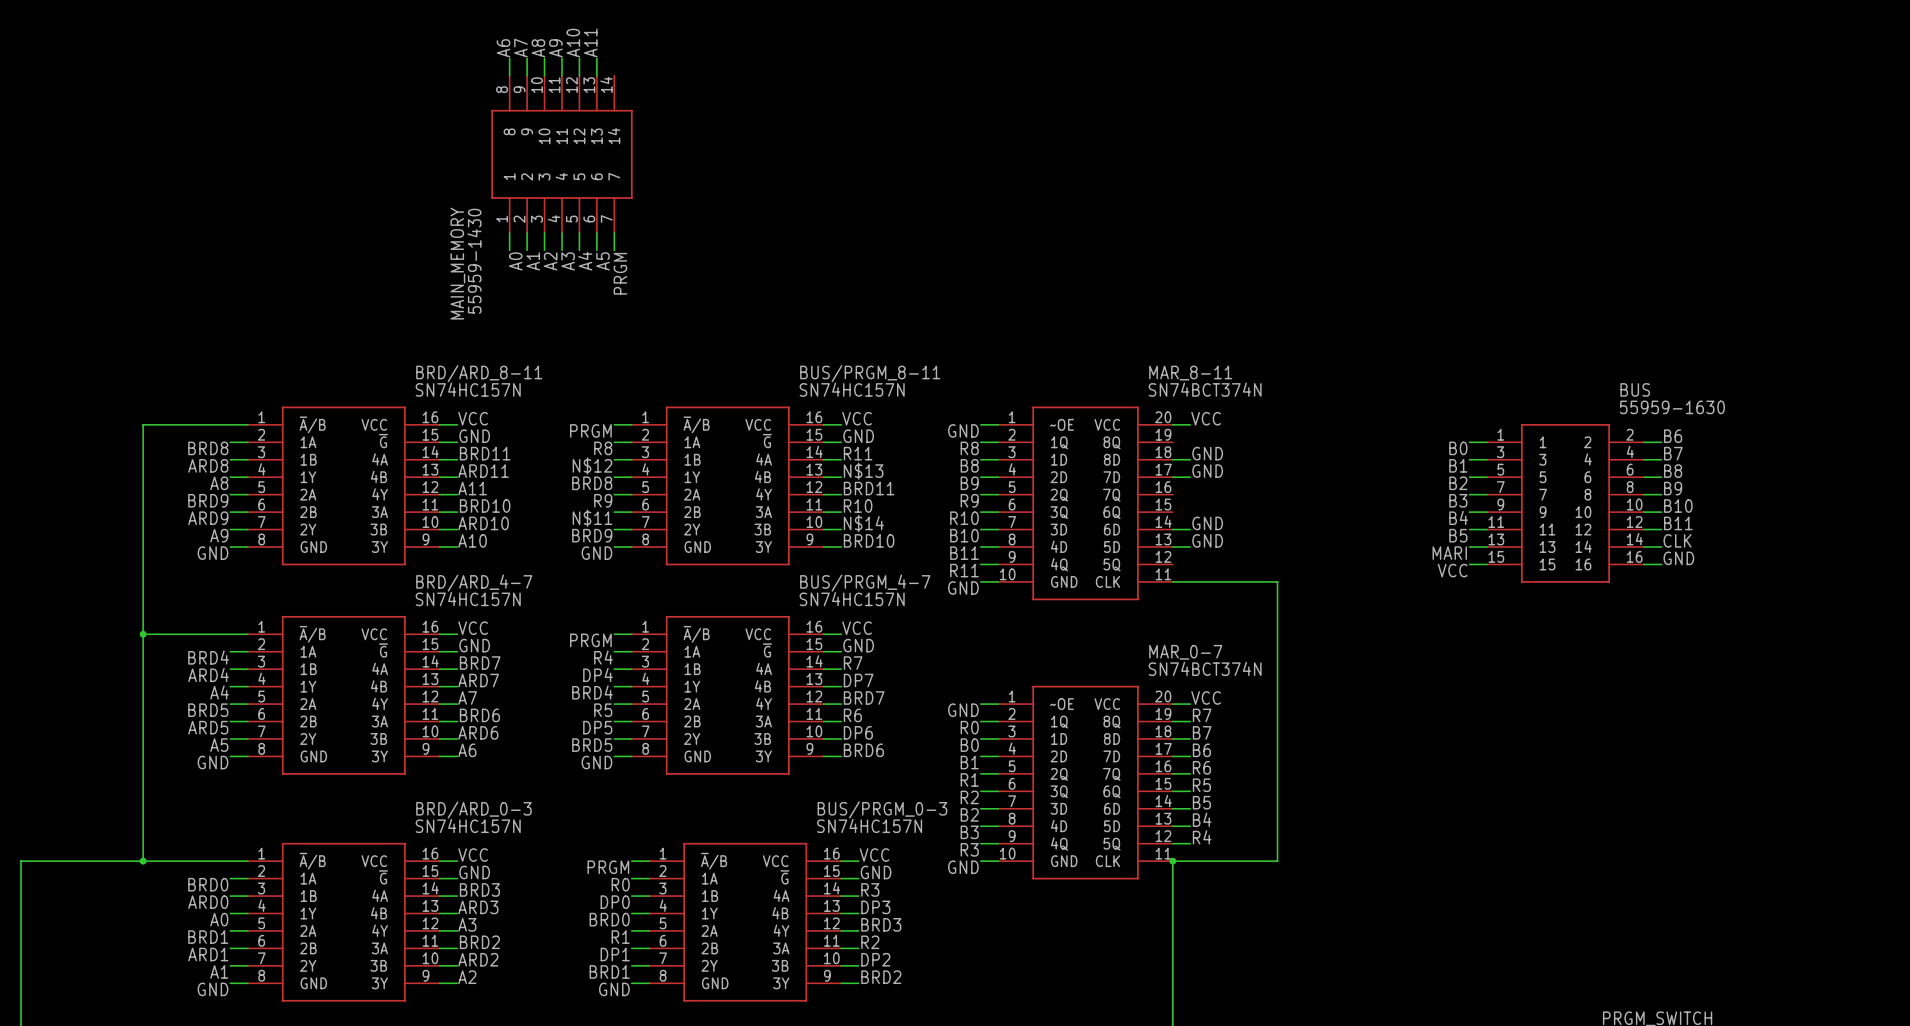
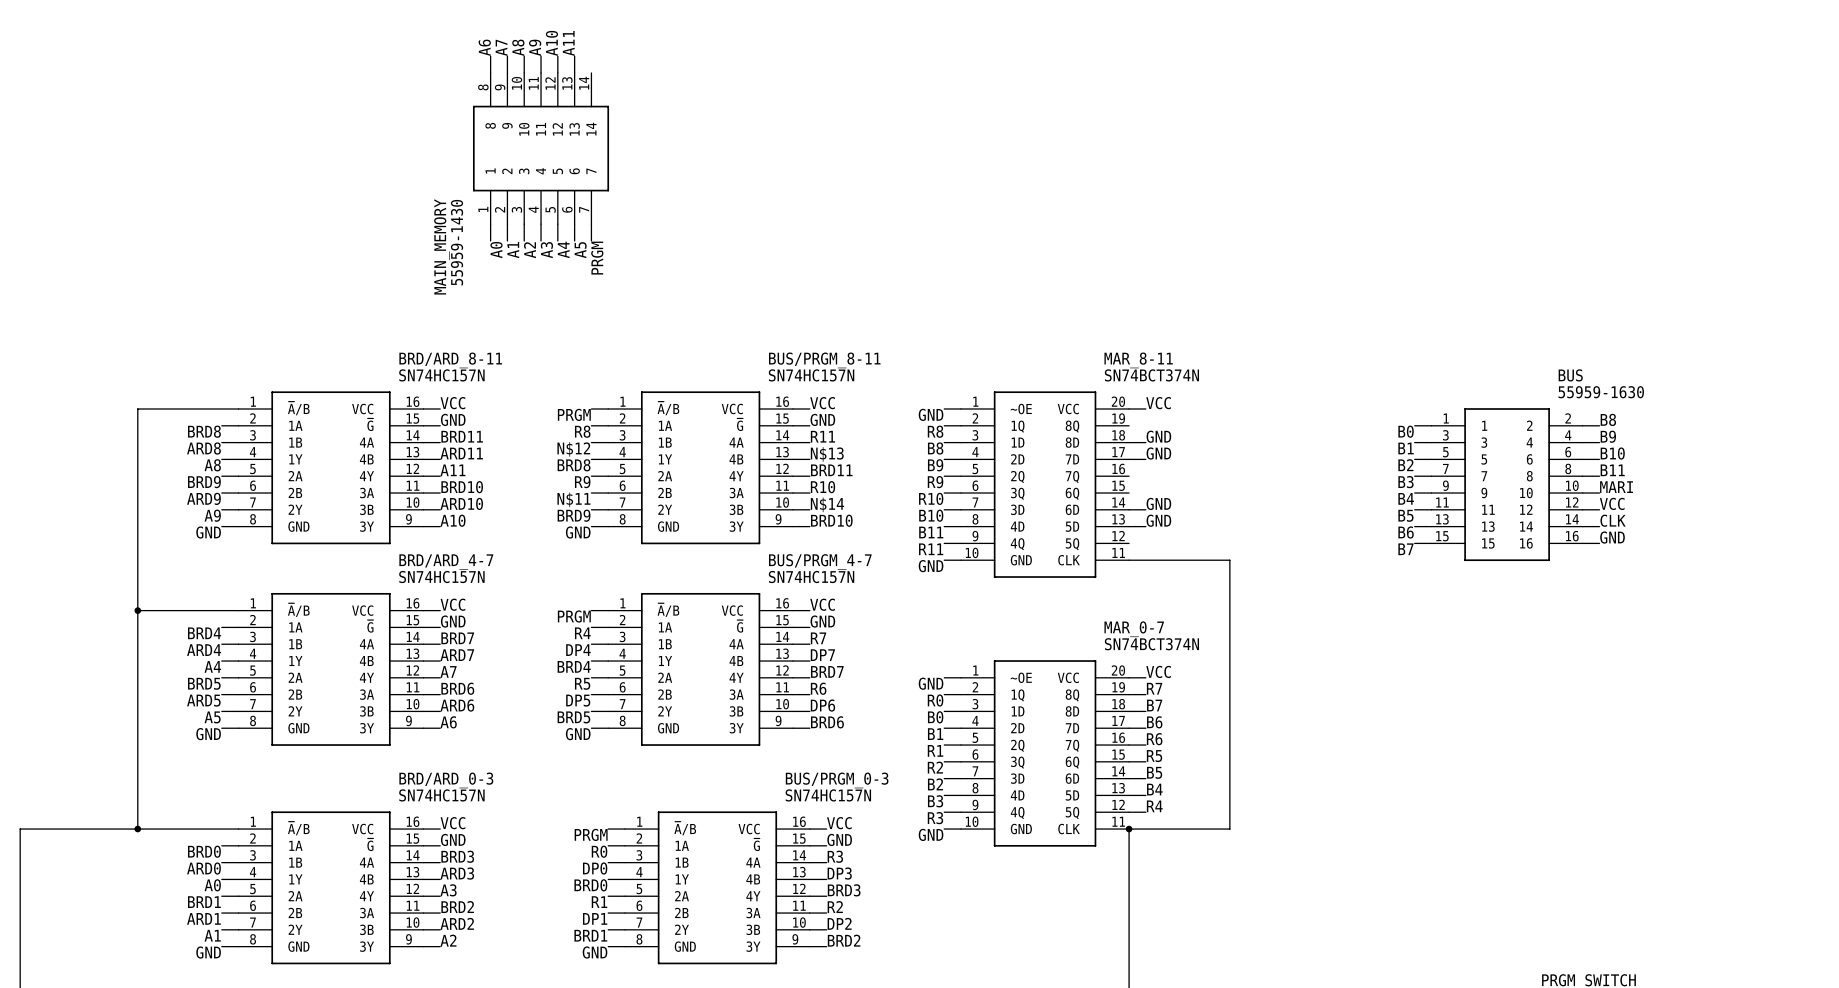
label: B6 (1673, 436) -> B8 (1608, 419)
label: B7 (1673, 453) -> B9 (1608, 436)
label: B8 (1673, 471) -> B10 (1612, 453)
label: B9 (1673, 488) -> B11 (1612, 470)
label: B10 (1678, 506) -> MARI (1616, 487)
label: B11 (1678, 523) -> VCC (1612, 503)
label: MARI (1449, 553) -> B6 (1406, 532)
label: VCC (1452, 570) -> B7 (1405, 549)

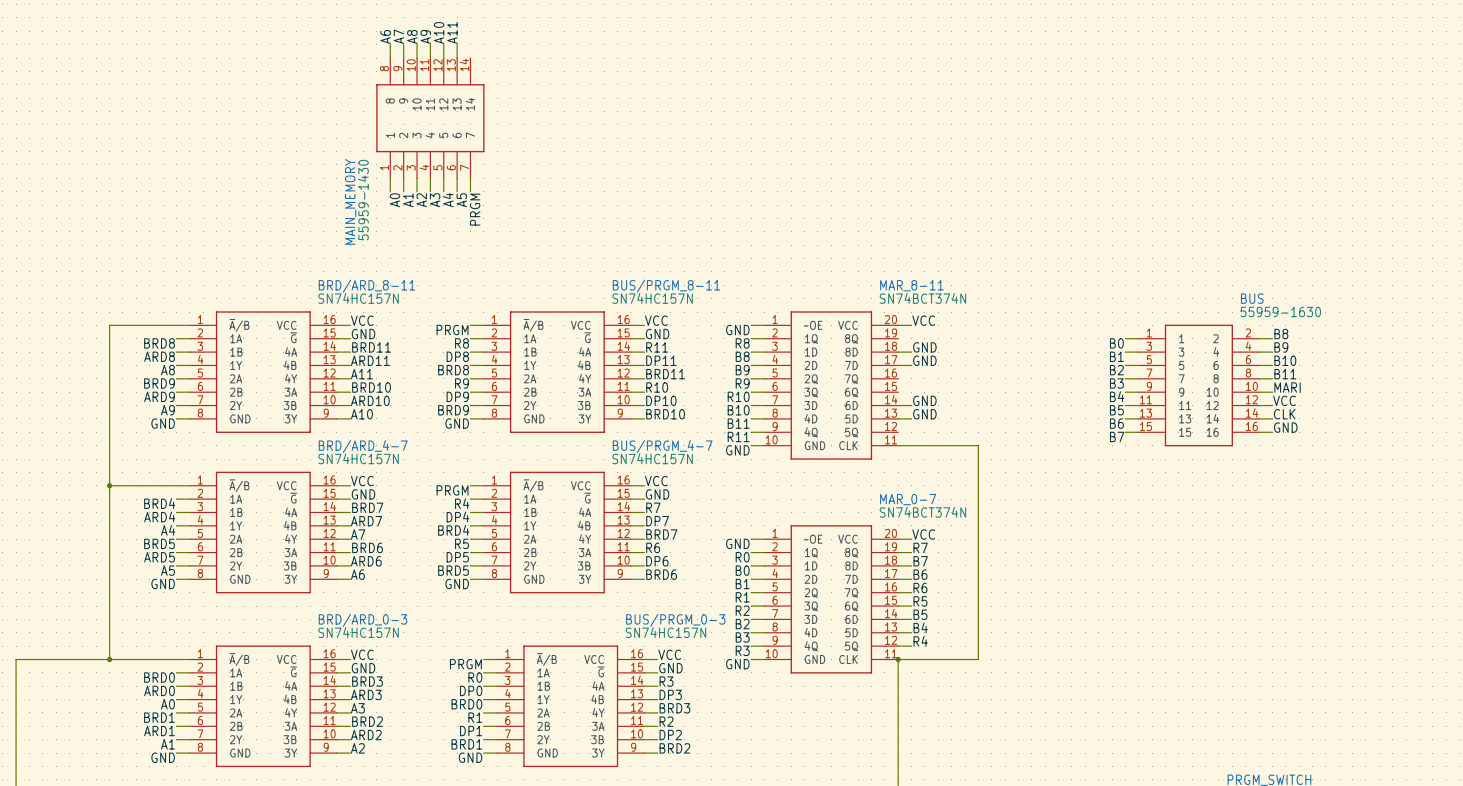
label: N$12 (573, 449) -> DP8 (457, 356)
label: N$13 (827, 454) -> DP11 (661, 360)
label: N$11 (573, 499) -> DP9 (457, 396)
label: N$14 (827, 504) -> DP10 (661, 400)

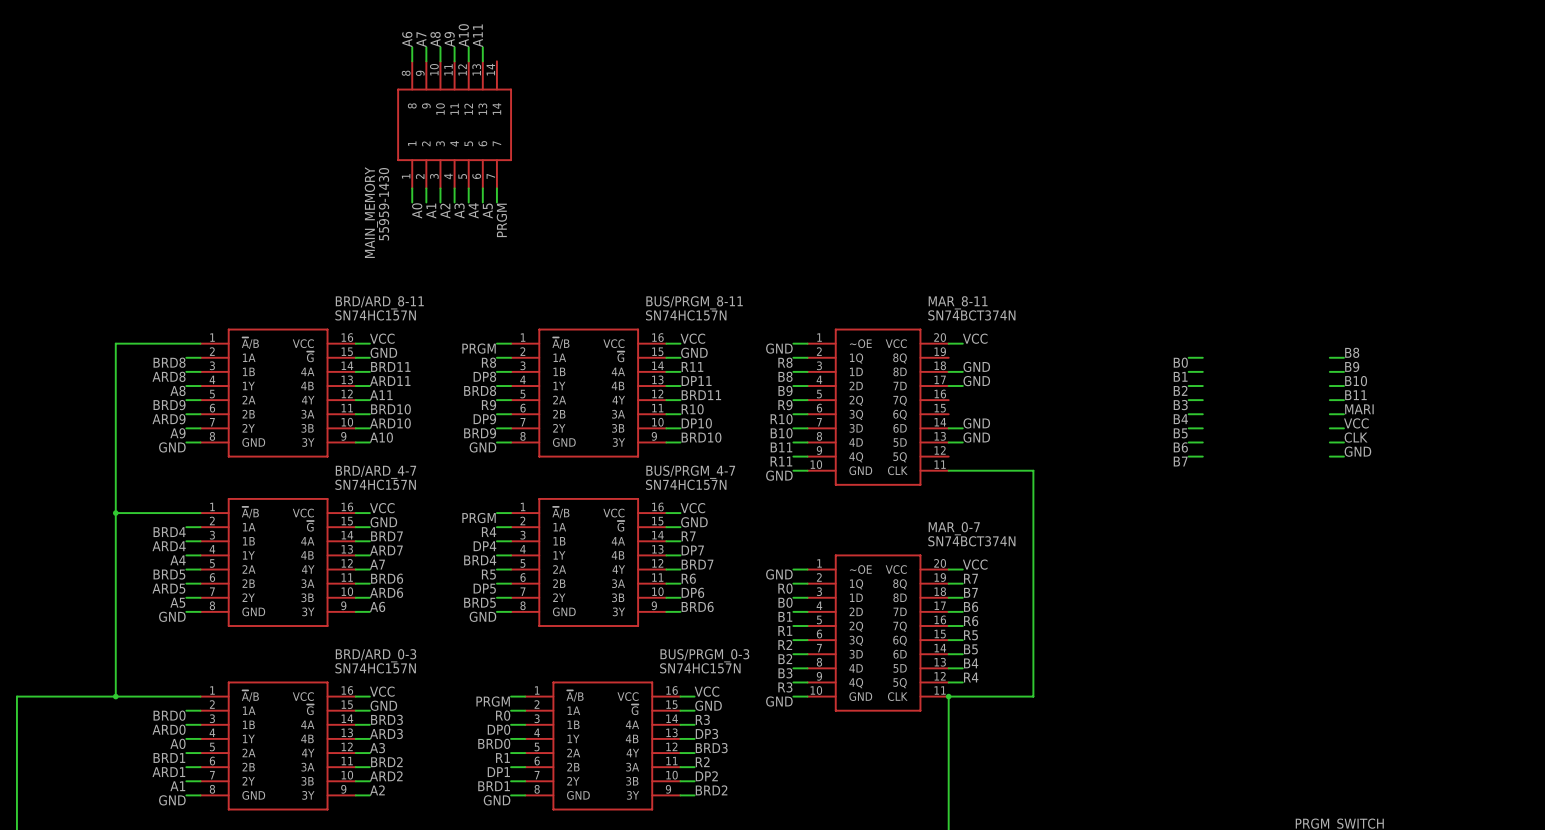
BUS: 55959-1630 (1198, 385) -> none

